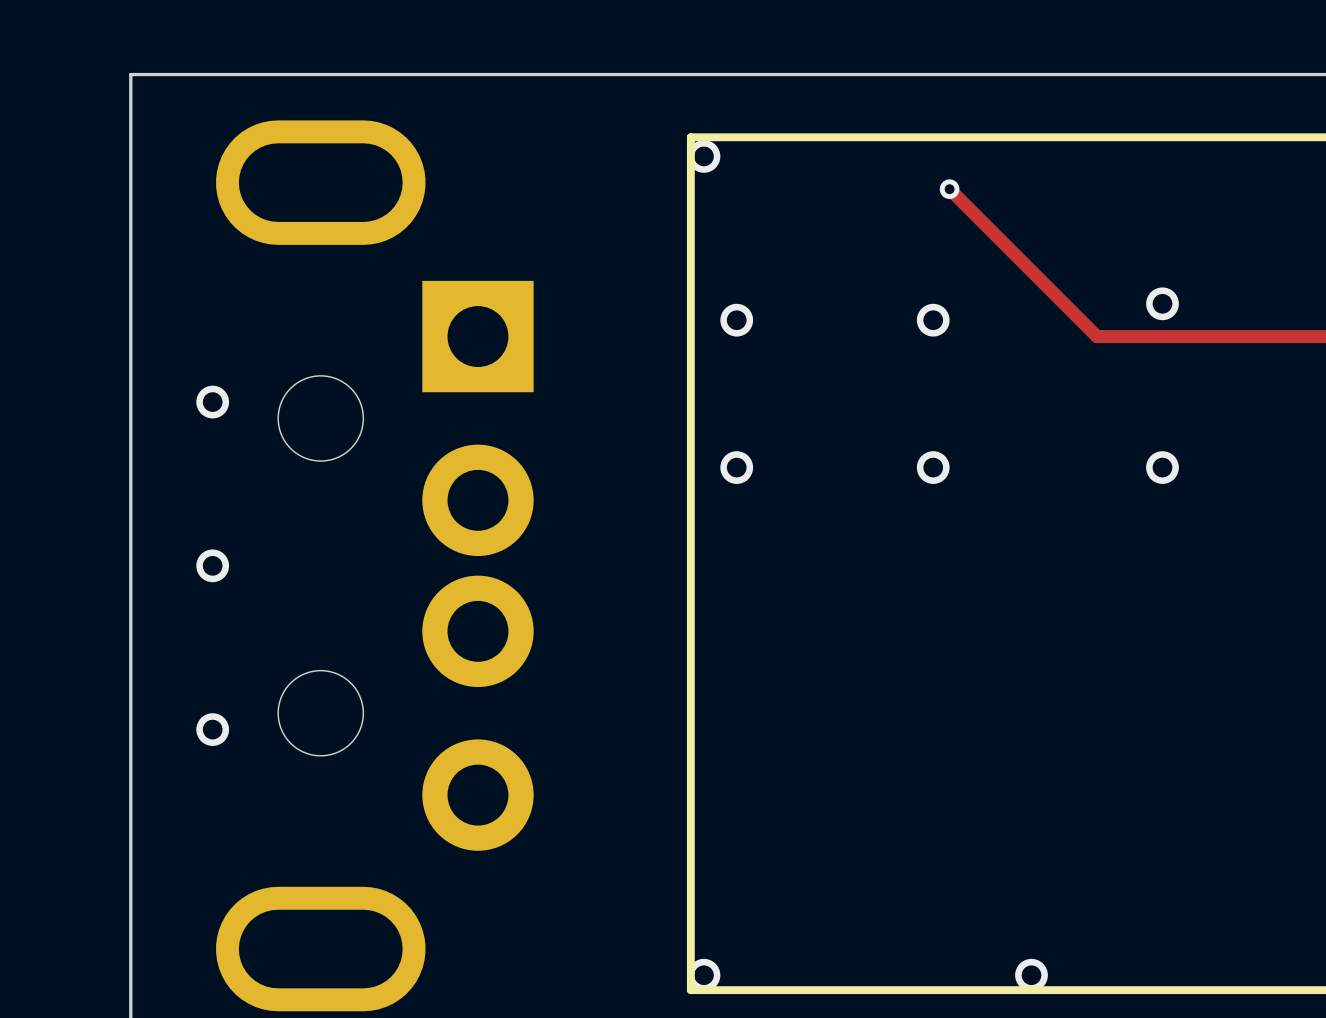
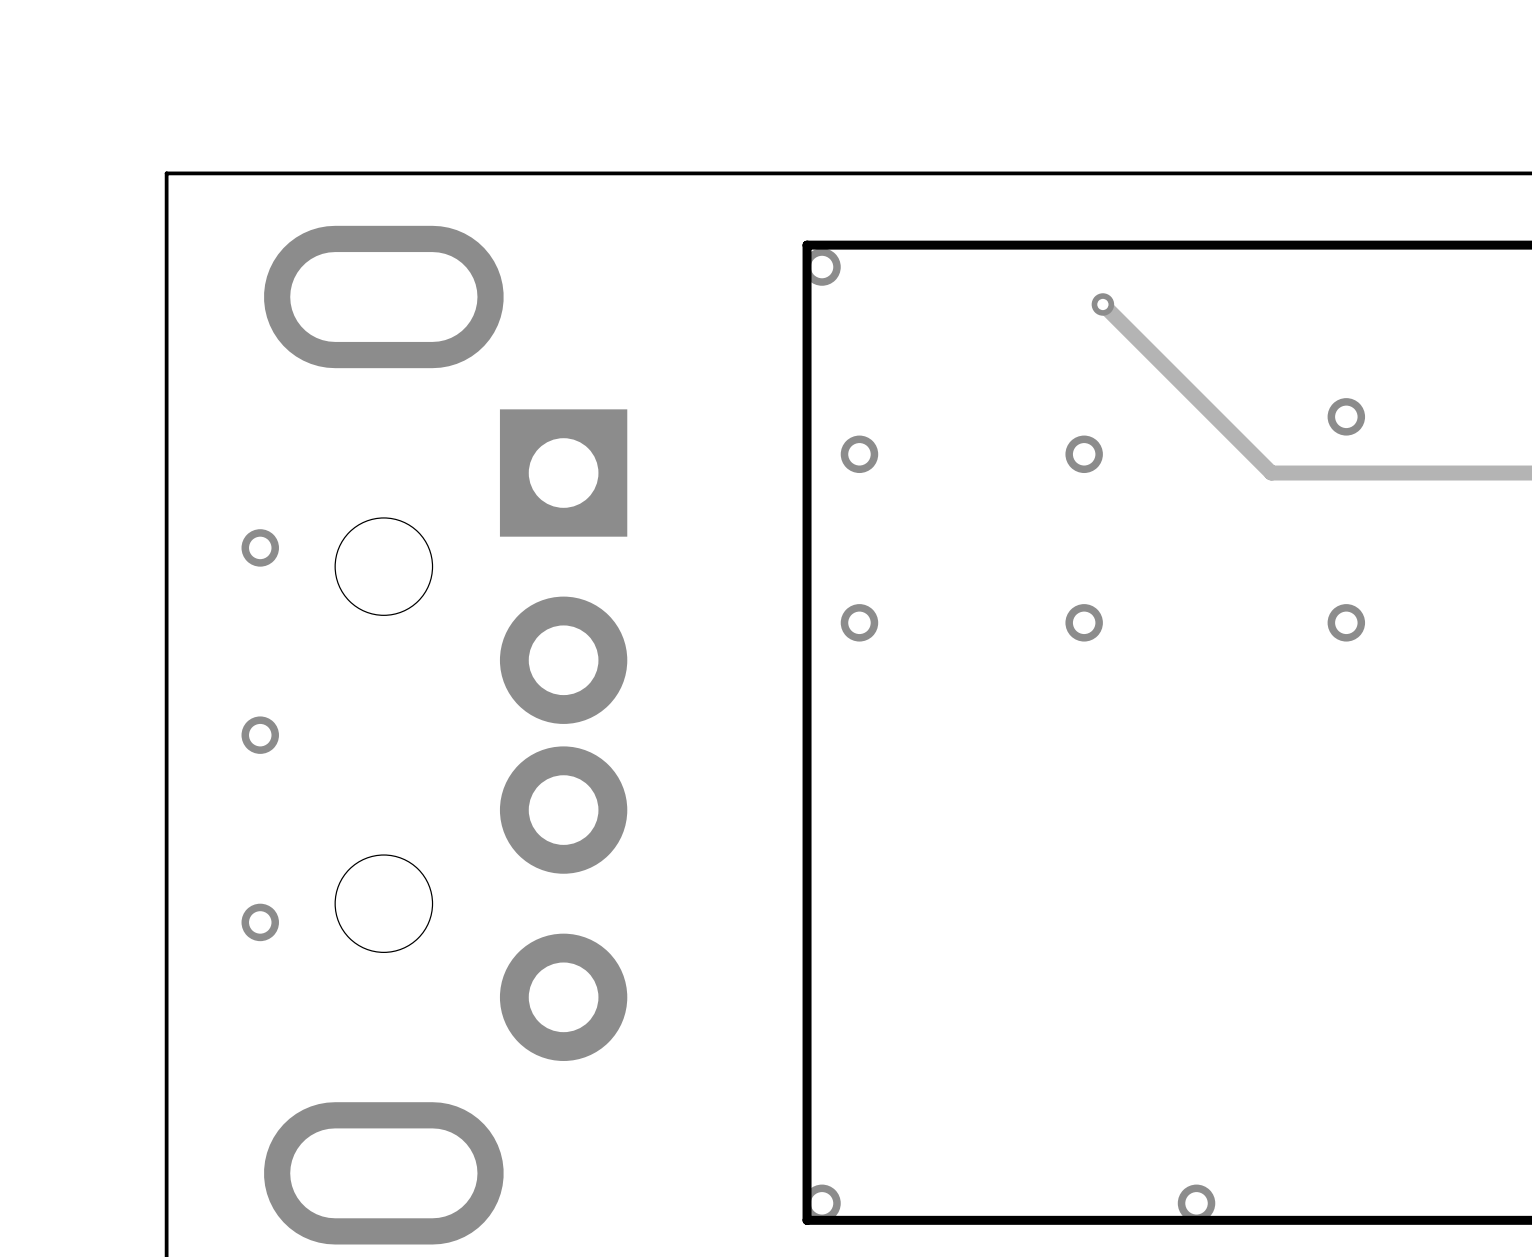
via position: (1162, 303) -> (1346, 416)

